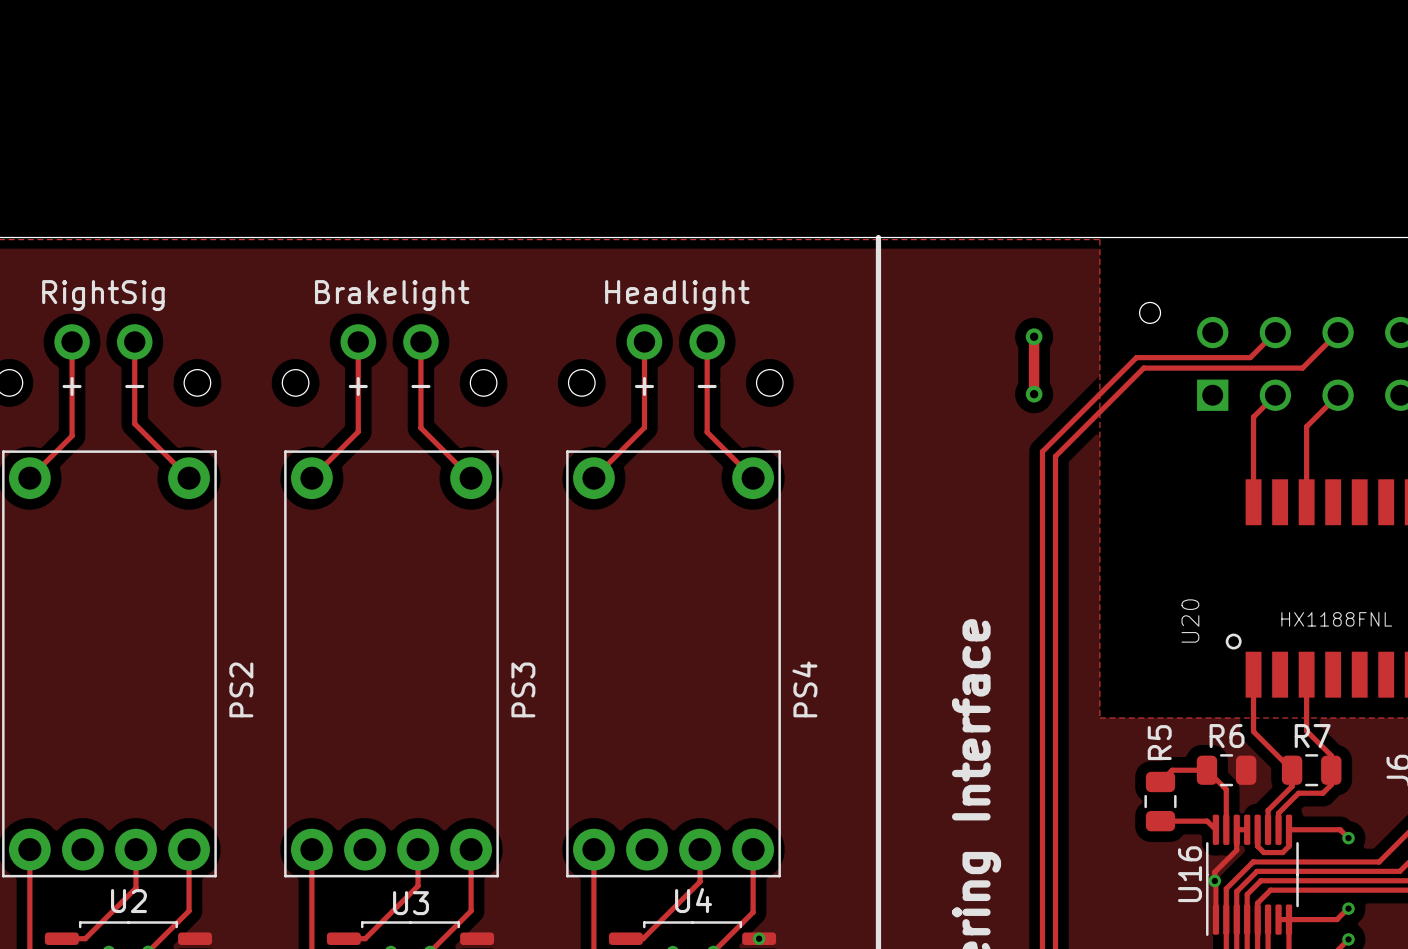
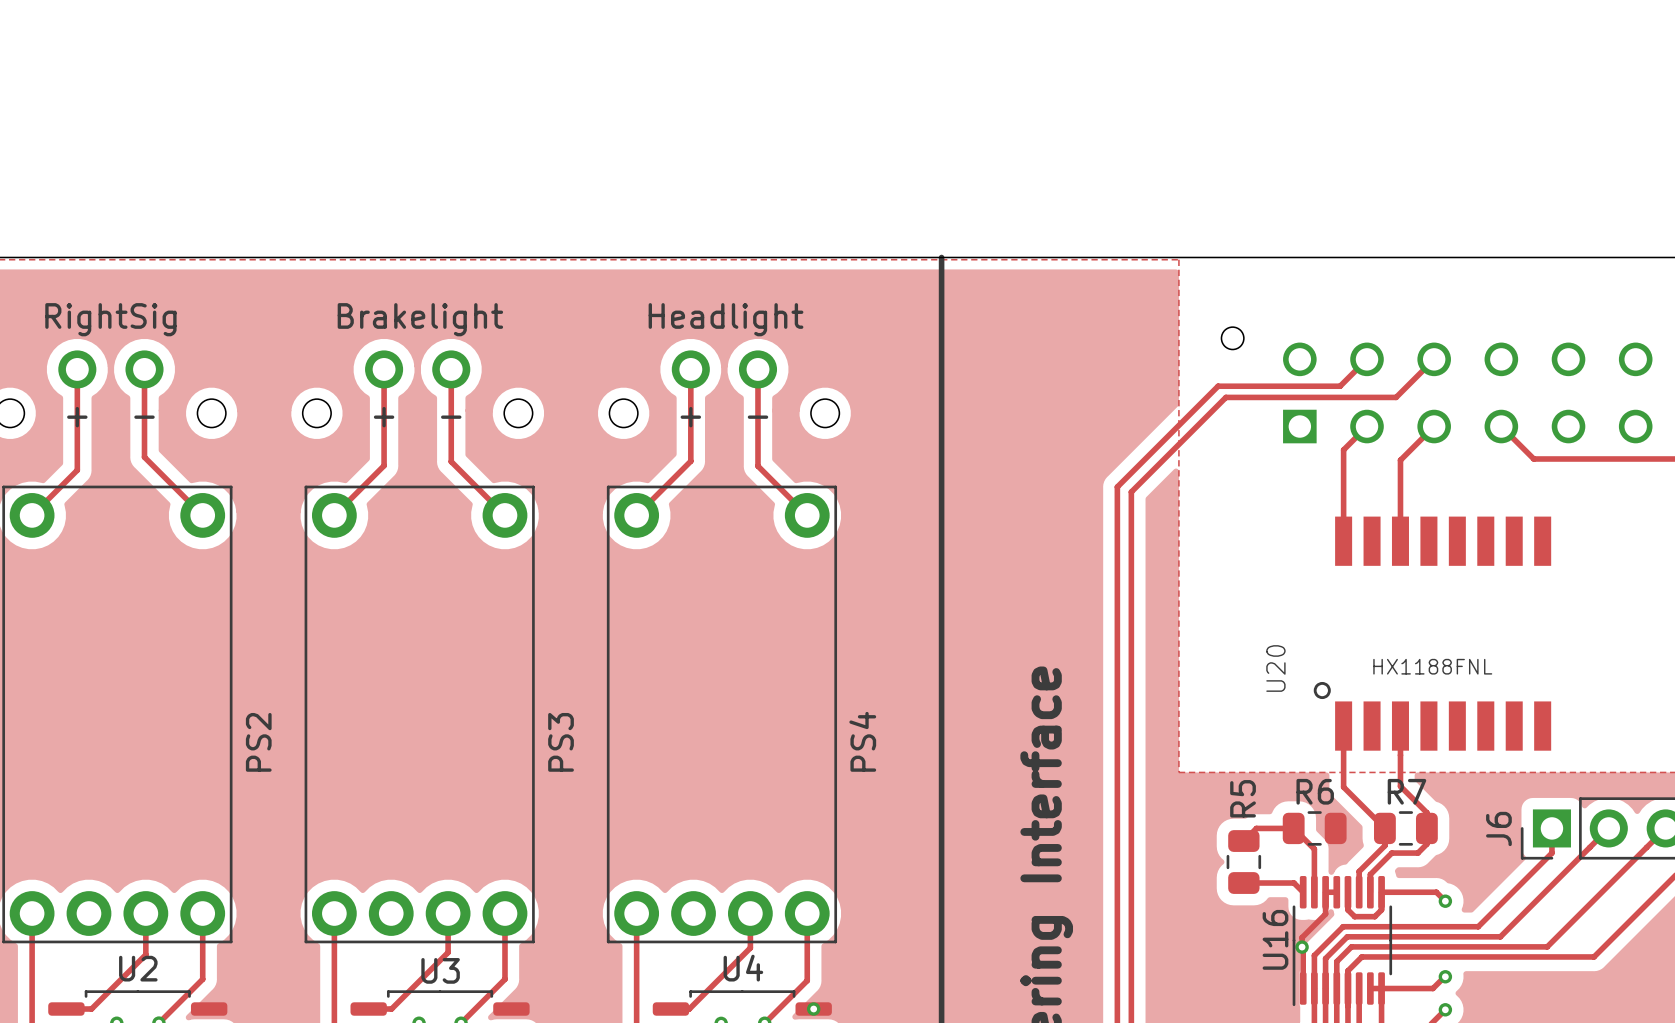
track: (1034, 336) (1034, 394) -> none
via: (1034, 336) -> none
via: (1034, 394) -> none

